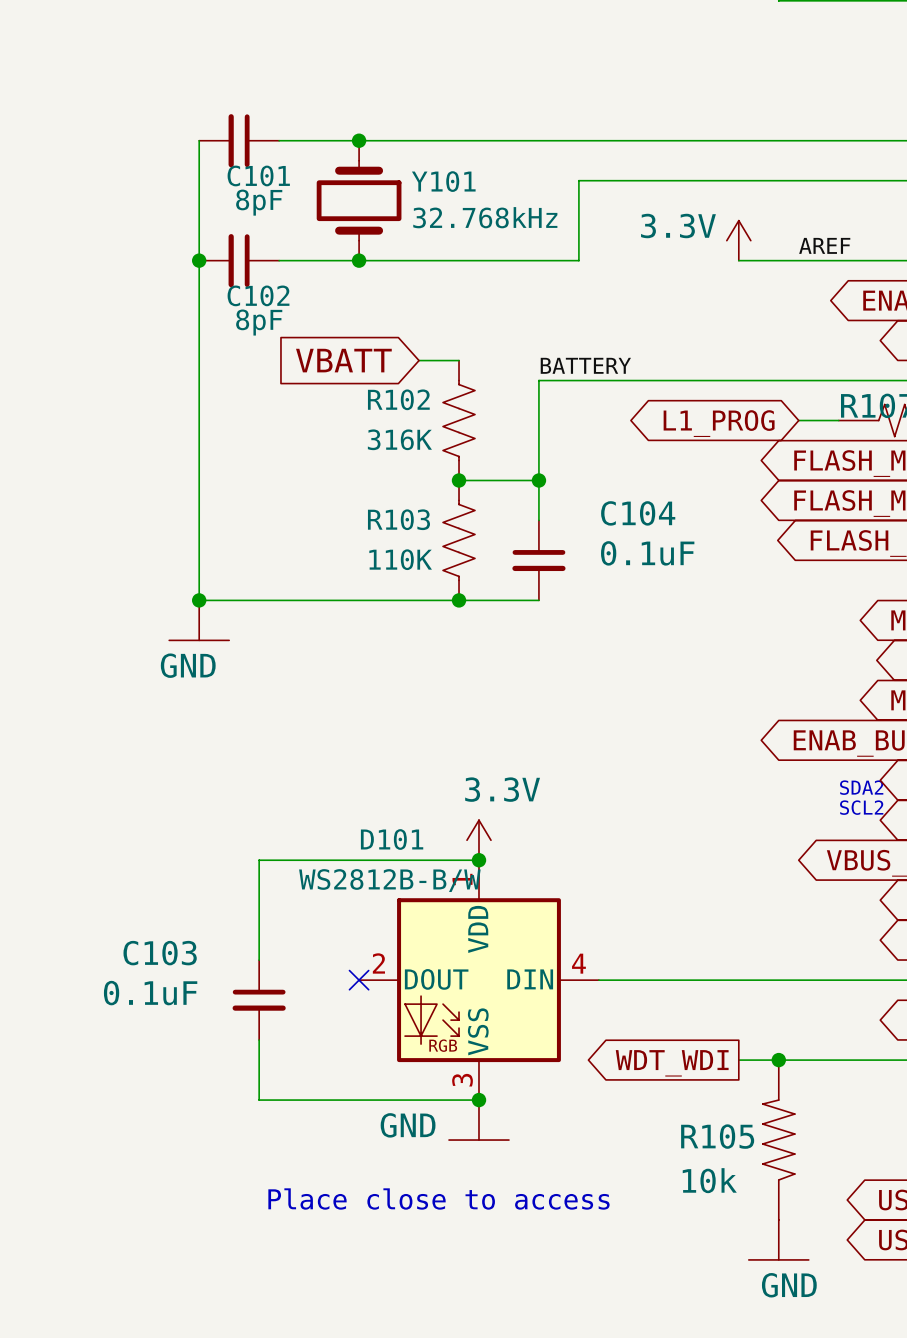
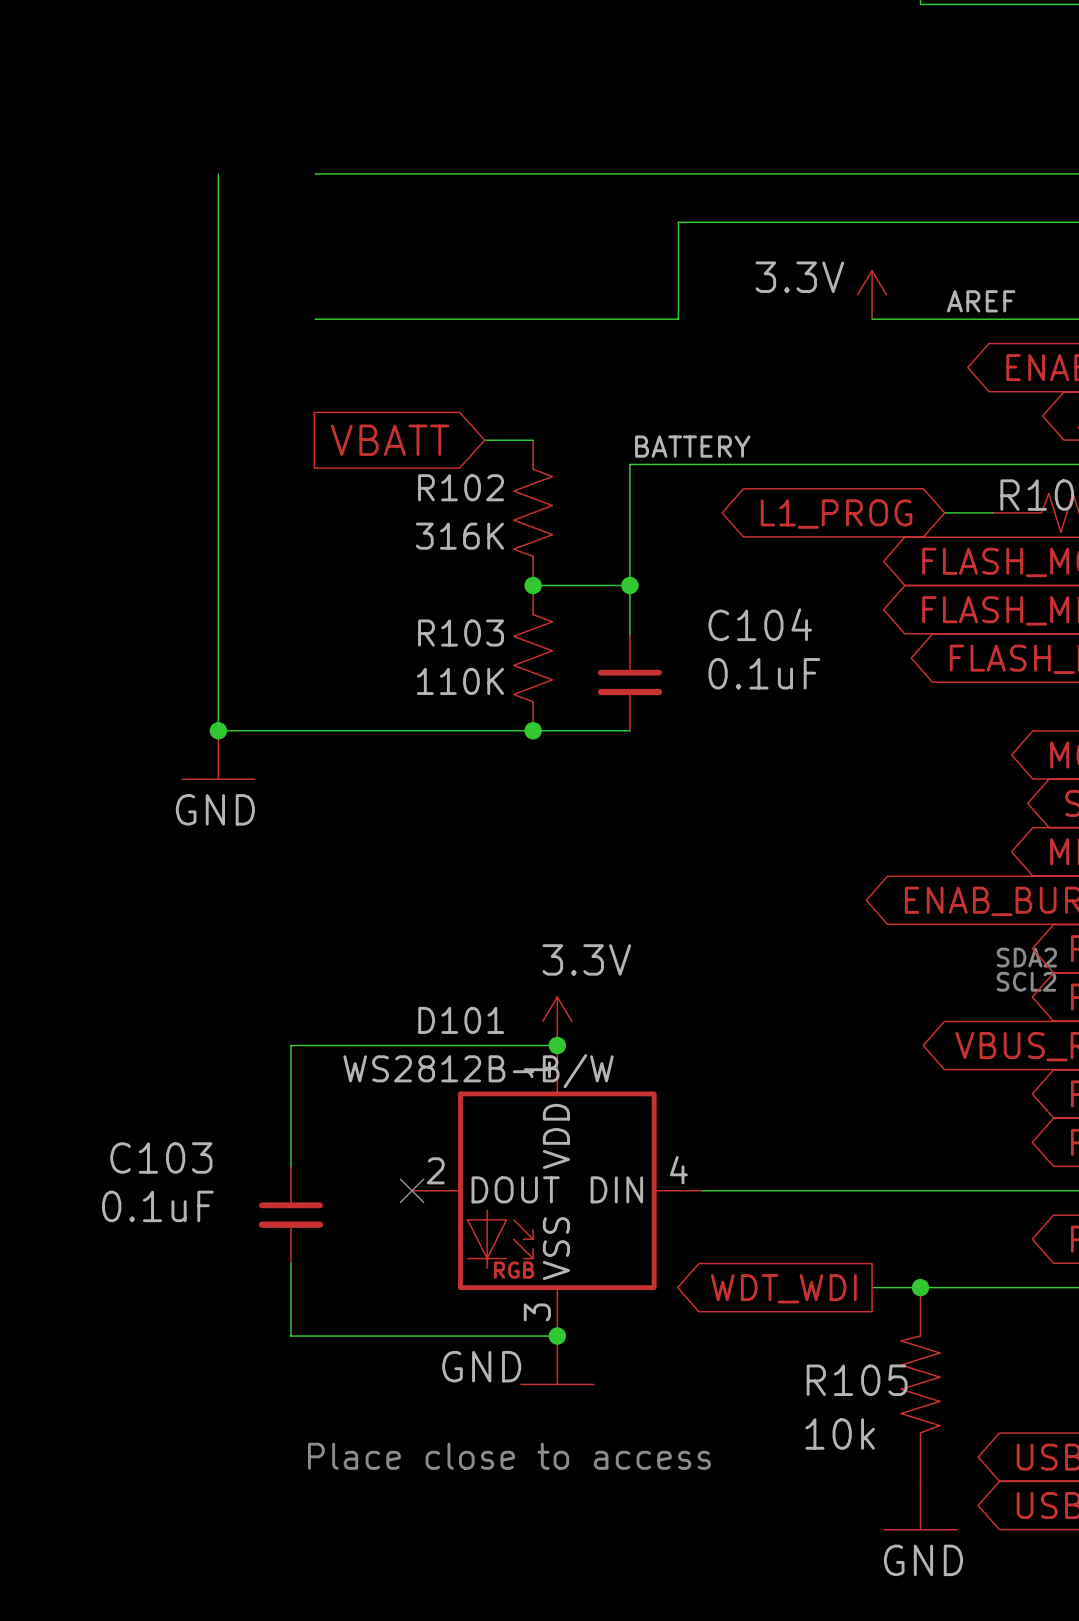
C101: 8pF (239, 140) -> none
junction: (359, 140) -> none
Y101: 32.768kHz (359, 200) -> none
junction: (199, 260) -> none
C102: 8pF (239, 260) -> none
junction: (359, 260) -> none

